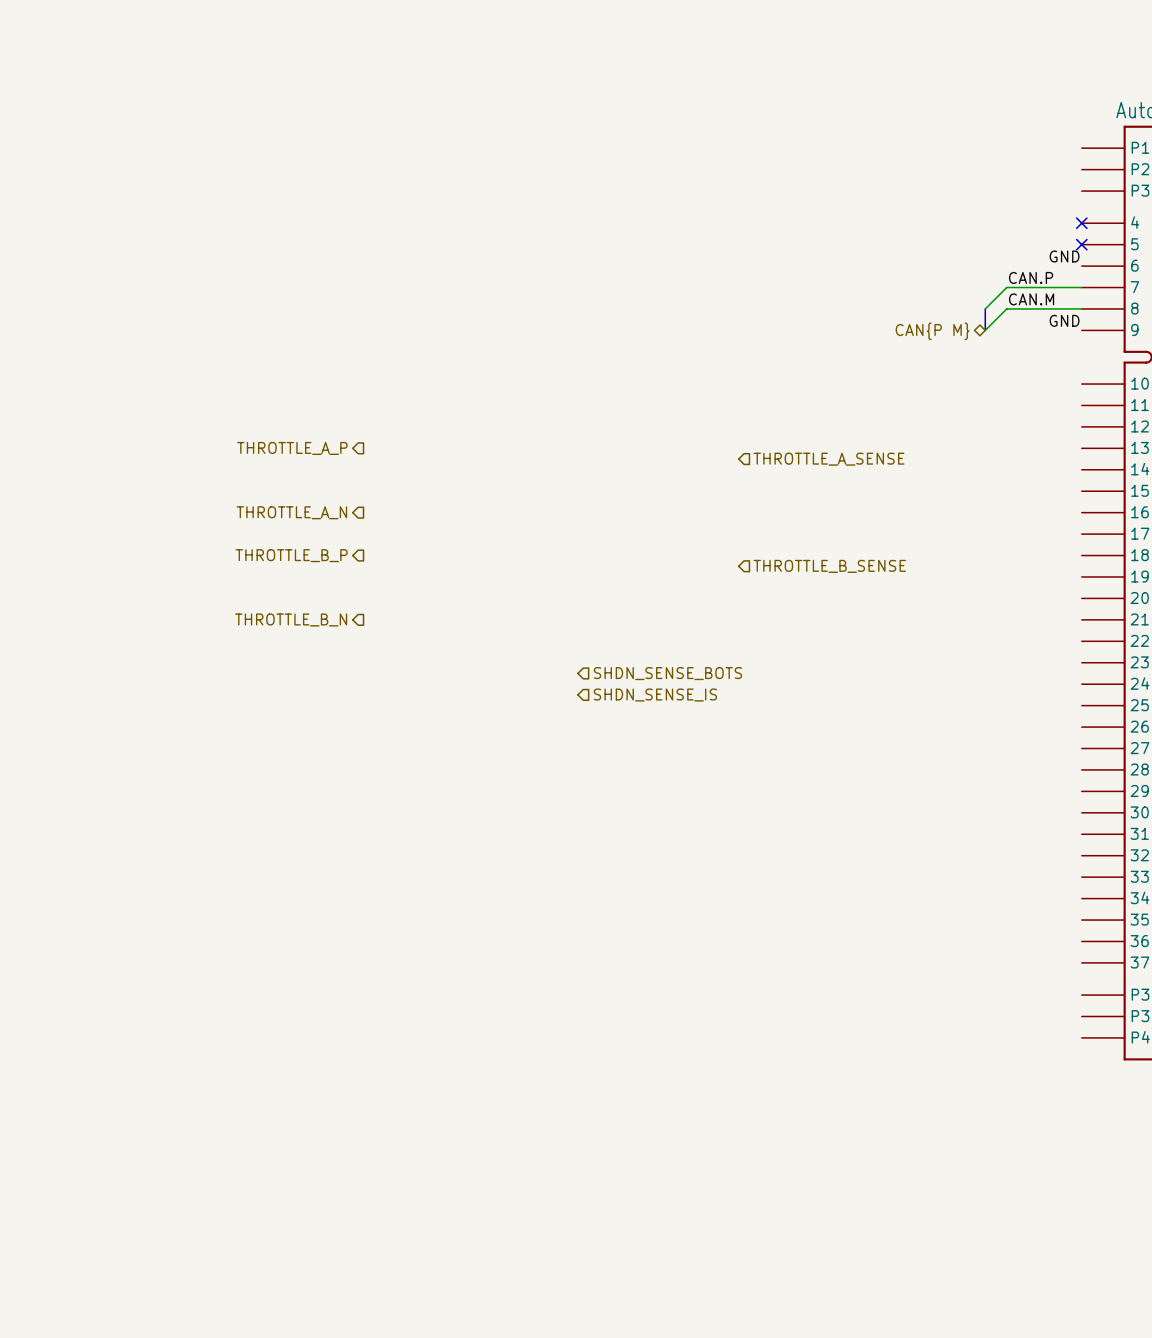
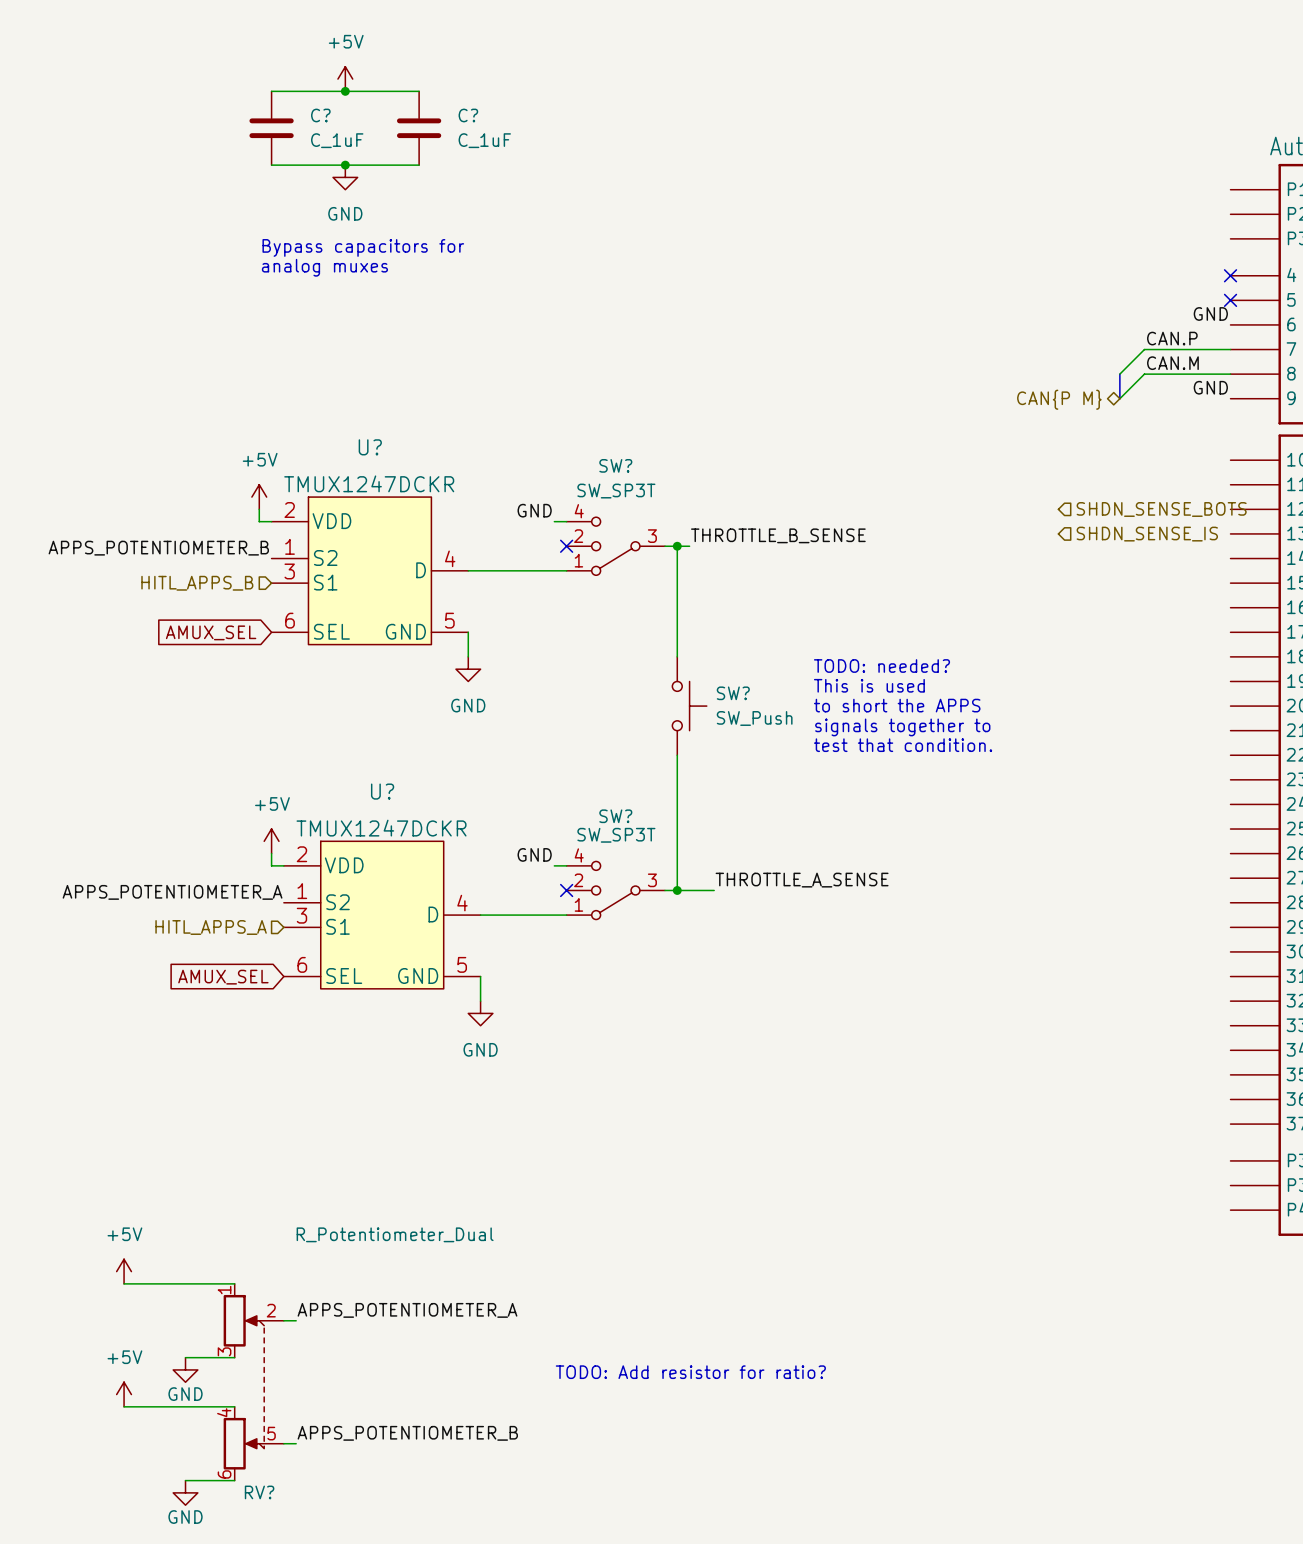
power symbol: none -> +5V (345, 79)
wire: none -> (271, 91) (419, 91)
junction: none -> (345, 91)
C?: none -> C_1uF (271, 128)
C?: none -> C_1uF (419, 128)
wire: none -> (271, 165) (419, 165)
junction: none -> (345, 165)
power symbol: none -> GND (345, 177)
text: none -> Bypass capacitors for (363, 247)
text: none -> analog muxes (324, 267)
power symbol: none -> +5V (259, 497)
wire: none -> (259, 509) (259, 521) (271, 521)
hierarchical label: none -> SHDN_SENSE_BOTS (1161, 509)
label: none -> GND (534, 510)
wire: none -> (554, 521) (566, 521)
hierarchical label: THROTTLE_A_P (292, 448) -> none
hierarchical label: none -> SHDN_SENSE_IS (1147, 534)
label: none -> THROTTLE_B_SENSE (778, 535)
no-connect mark: none -> (566, 546)
SW?: none -> SW_SP3T (615, 546)
wire: none -> (664, 546) (689, 546)
wire: none -> (677, 546) (677, 656)
junction: none -> (677, 546)
hierarchical label: THROTTLE_A_SENSE (828, 459) -> none
label: none -> APPS_POTENTIOMETER_B (158, 548)
U?: none -> TMUX1247DCKR (369, 570)
wire: none -> (468, 570) (566, 570)
hierarchical label: none -> HITL_APPS_B (197, 583)
hierarchical label: THROTTLE_A_N (291, 512) -> none
global label: none -> AMUX_SEL (211, 632)
wire: none -> (468, 632) (468, 656)
hierarchical label: THROTTLE_B_P (291, 555) -> none
text: none -> TODO: needed? (881, 666)
power symbol: none -> GND (468, 669)
hierarchical label: THROTTLE_B_SENSE (829, 566) -> none
text: none -> This is used (869, 685)
SW?: none -> SW_Push (689, 706)
text: none -> to short the APPS (897, 705)
text: none -> signals together to (902, 727)
hierarchical label: THROTTLE_B_N (291, 619) -> none
text: none -> test that condition. (903, 745)
wire: none -> (677, 755) (677, 890)
hierarchical label: SHDN_SENSE_BOTS (667, 673) -> none
hierarchical label: SHDN_SENSE_IS (655, 695) -> none
power symbol: none -> +5V (271, 841)
wire: none -> (271, 853) (271, 865) (283, 865)
label: none -> GND (534, 854)
wire: none -> (554, 865) (566, 865)
label: none -> THROTTLE_A_SENSE (802, 880)
no-connect mark: none -> (566, 890)
SW?: none -> SW_SP3T (615, 890)
wire: none -> (664, 890) (714, 890)
junction: none -> (677, 890)
label: none -> APPS_POTENTIOMETER_A (172, 892)
U?: none -> TMUX1247DCKR (382, 915)
wire: none -> (480, 915) (566, 915)
hierarchical label: none -> HITL_APPS_A (211, 927)
global label: none -> AMUX_SEL (223, 977)
wire: none -> (480, 976) (480, 1001)
power symbol: none -> GND (480, 1013)
power symbol: none -> +5V (124, 1271)
wire: none -> (124, 1283) (234, 1283)
label: none -> APPS_POTENTIOMETER_A (407, 1310)
wire: none -> (283, 1320) (296, 1320)
wire: none -> (185, 1357) (234, 1357)
power symbol: none -> GND (185, 1369)
text: none -> TODO: Add resistor for ratio? (690, 1372)
RV?: none -> R_Potentiometer_Dual (253, 1382)
power symbol: none -> +5V (124, 1394)
wire: none -> (124, 1406) (234, 1406)
label: none -> APPS_POTENTIOMETER_B (407, 1433)
wire: none -> (283, 1443) (296, 1443)
wire: none -> (185, 1480) (234, 1480)
power symbol: none -> GND (185, 1492)

